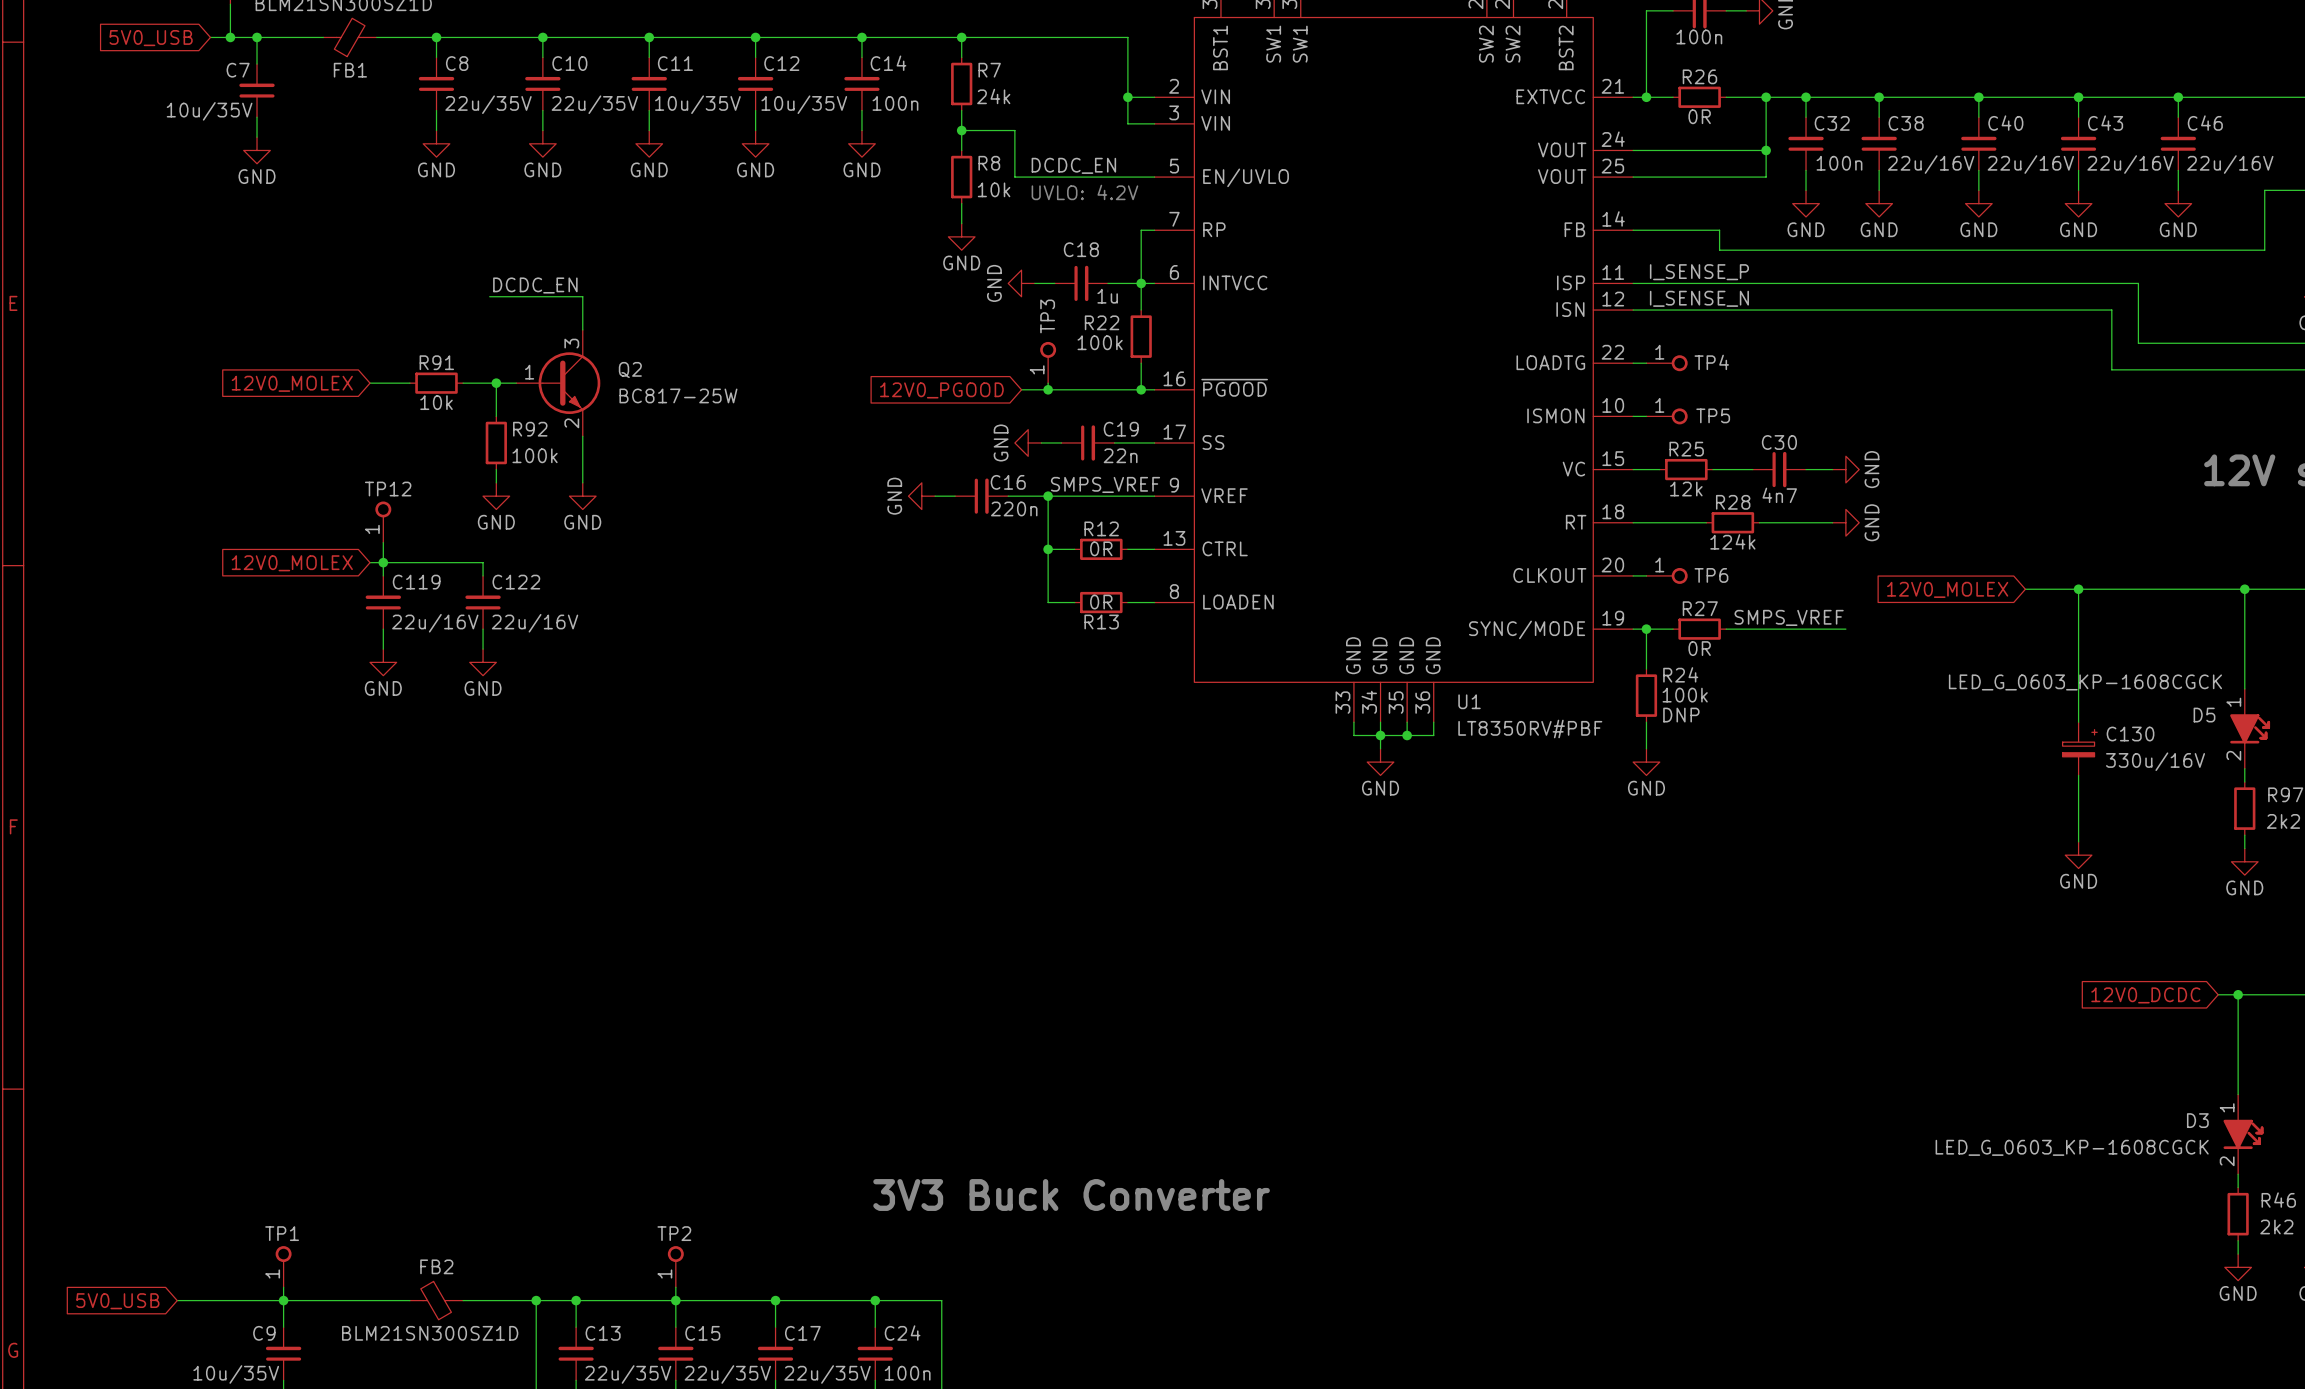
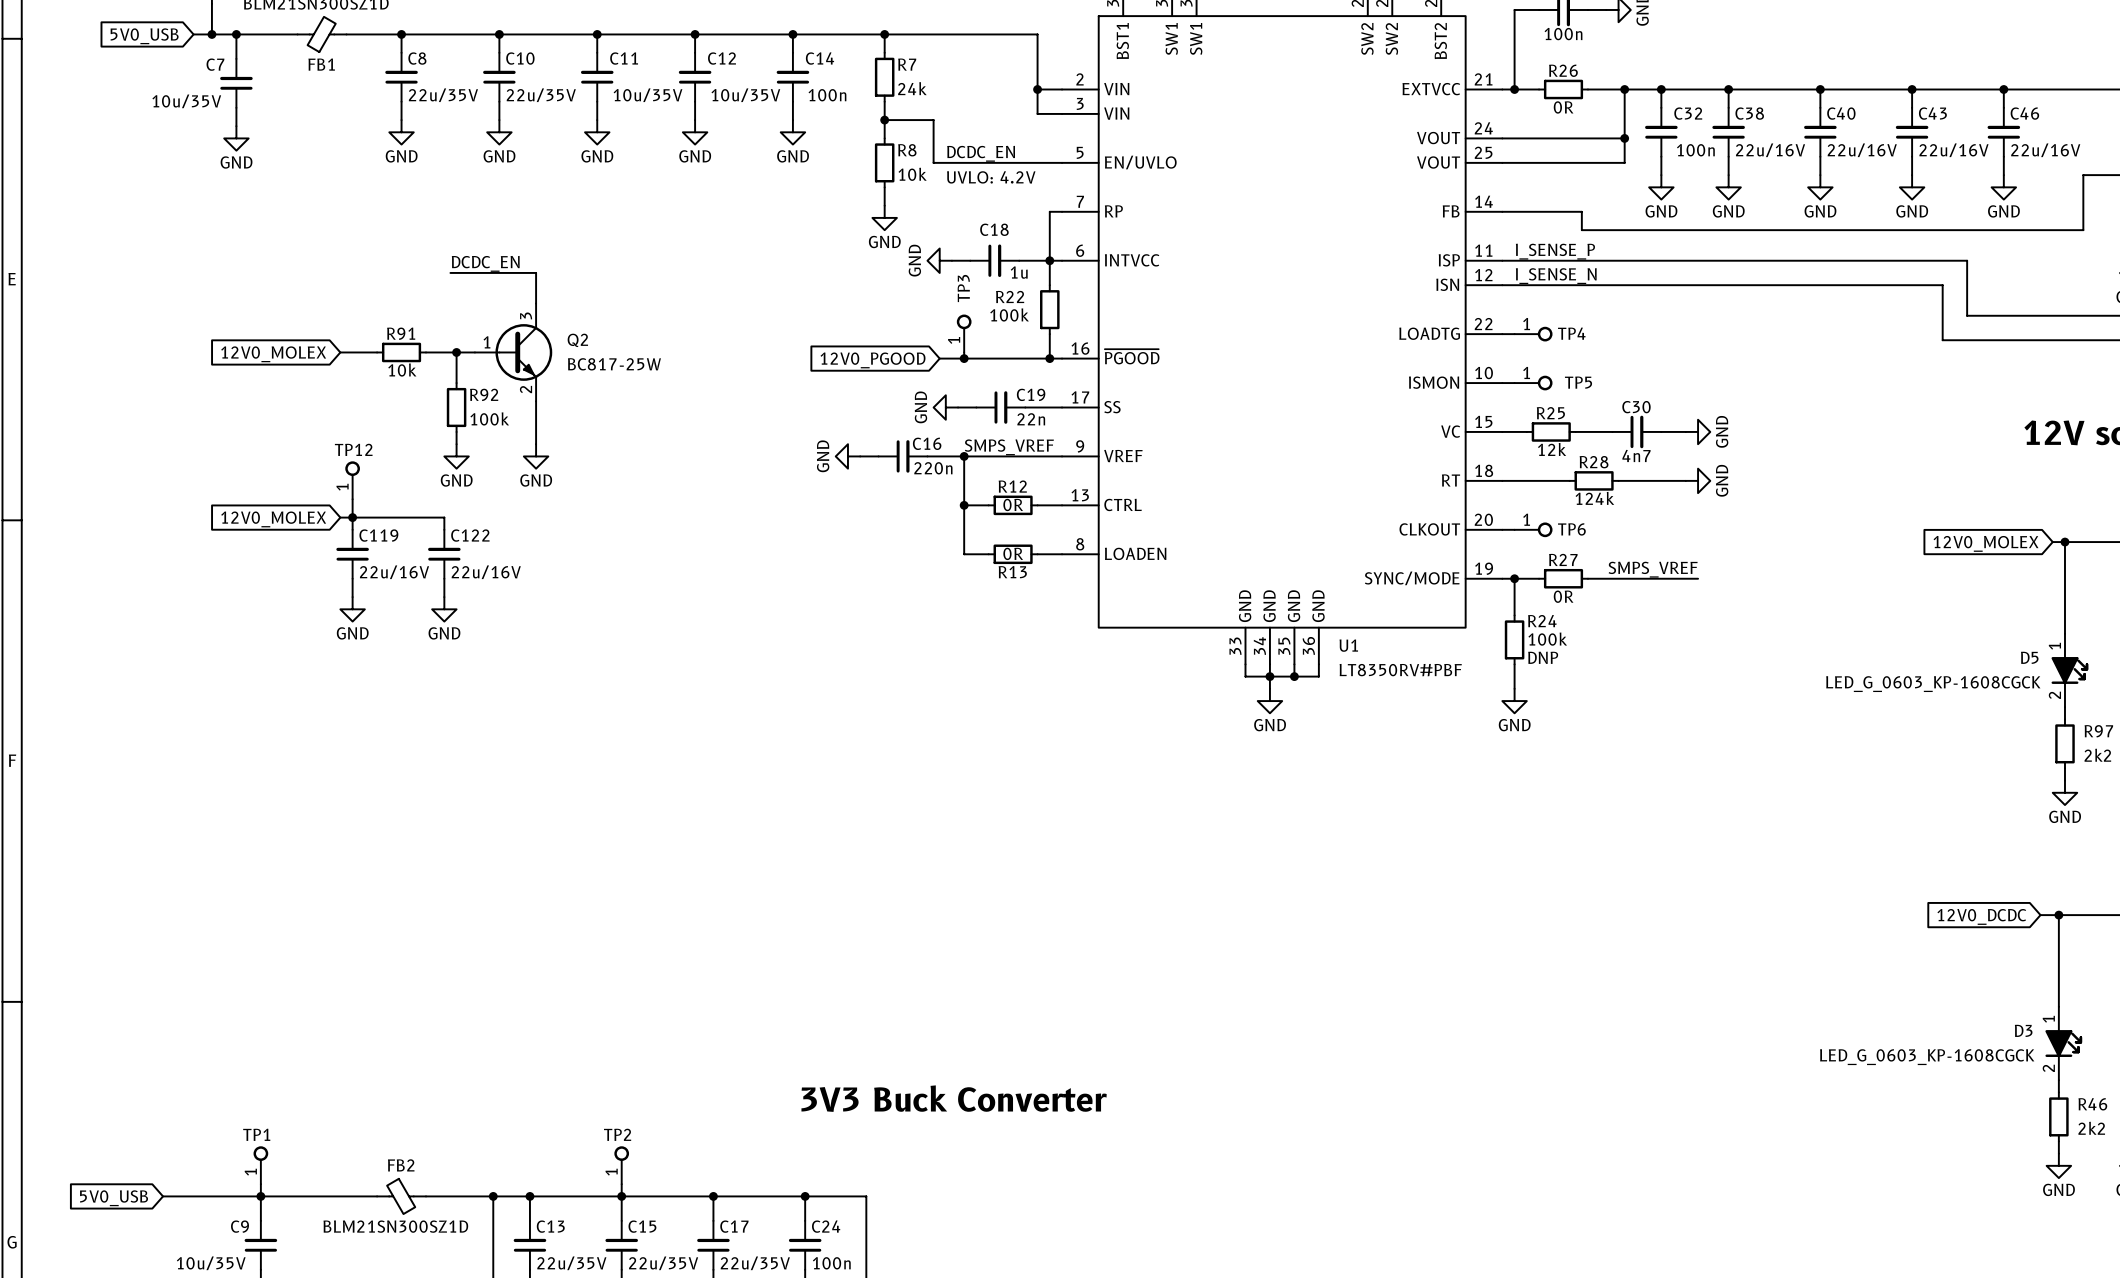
global label position: 12V0_MOLEX (1947, 589) -> 12V0_MOLEX (1986, 543)
wire: (2025, 589) (2231, 589) -> none
wire: (2078, 589) (2078, 722) -> none
junction: (2078, 589) -> none
D5 value position: LED_G_0603_KP-1608CGCK (2085, 682) -> LED_G_0603_KP-1608CGCK (1933, 684)
C130: (2079, 748) -> none
wire: (2078, 775) (2078, 841) -> none
power symbol: GND (2078, 855) -> none

